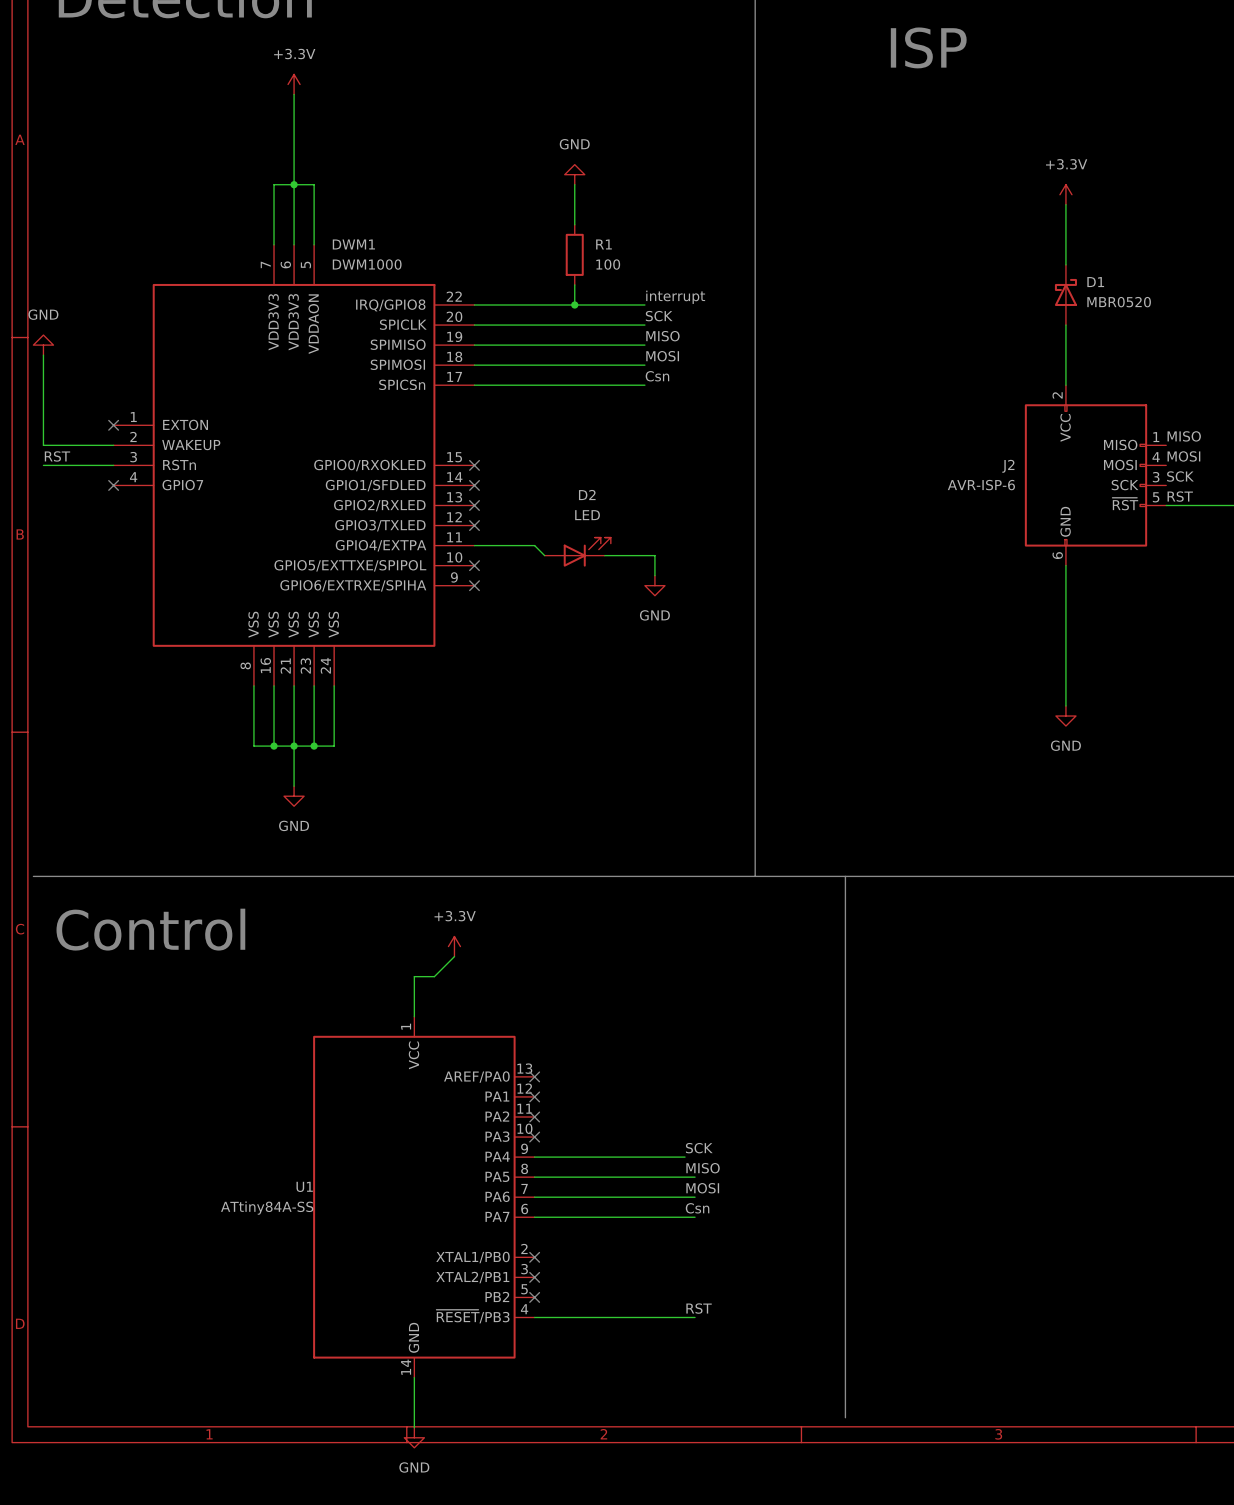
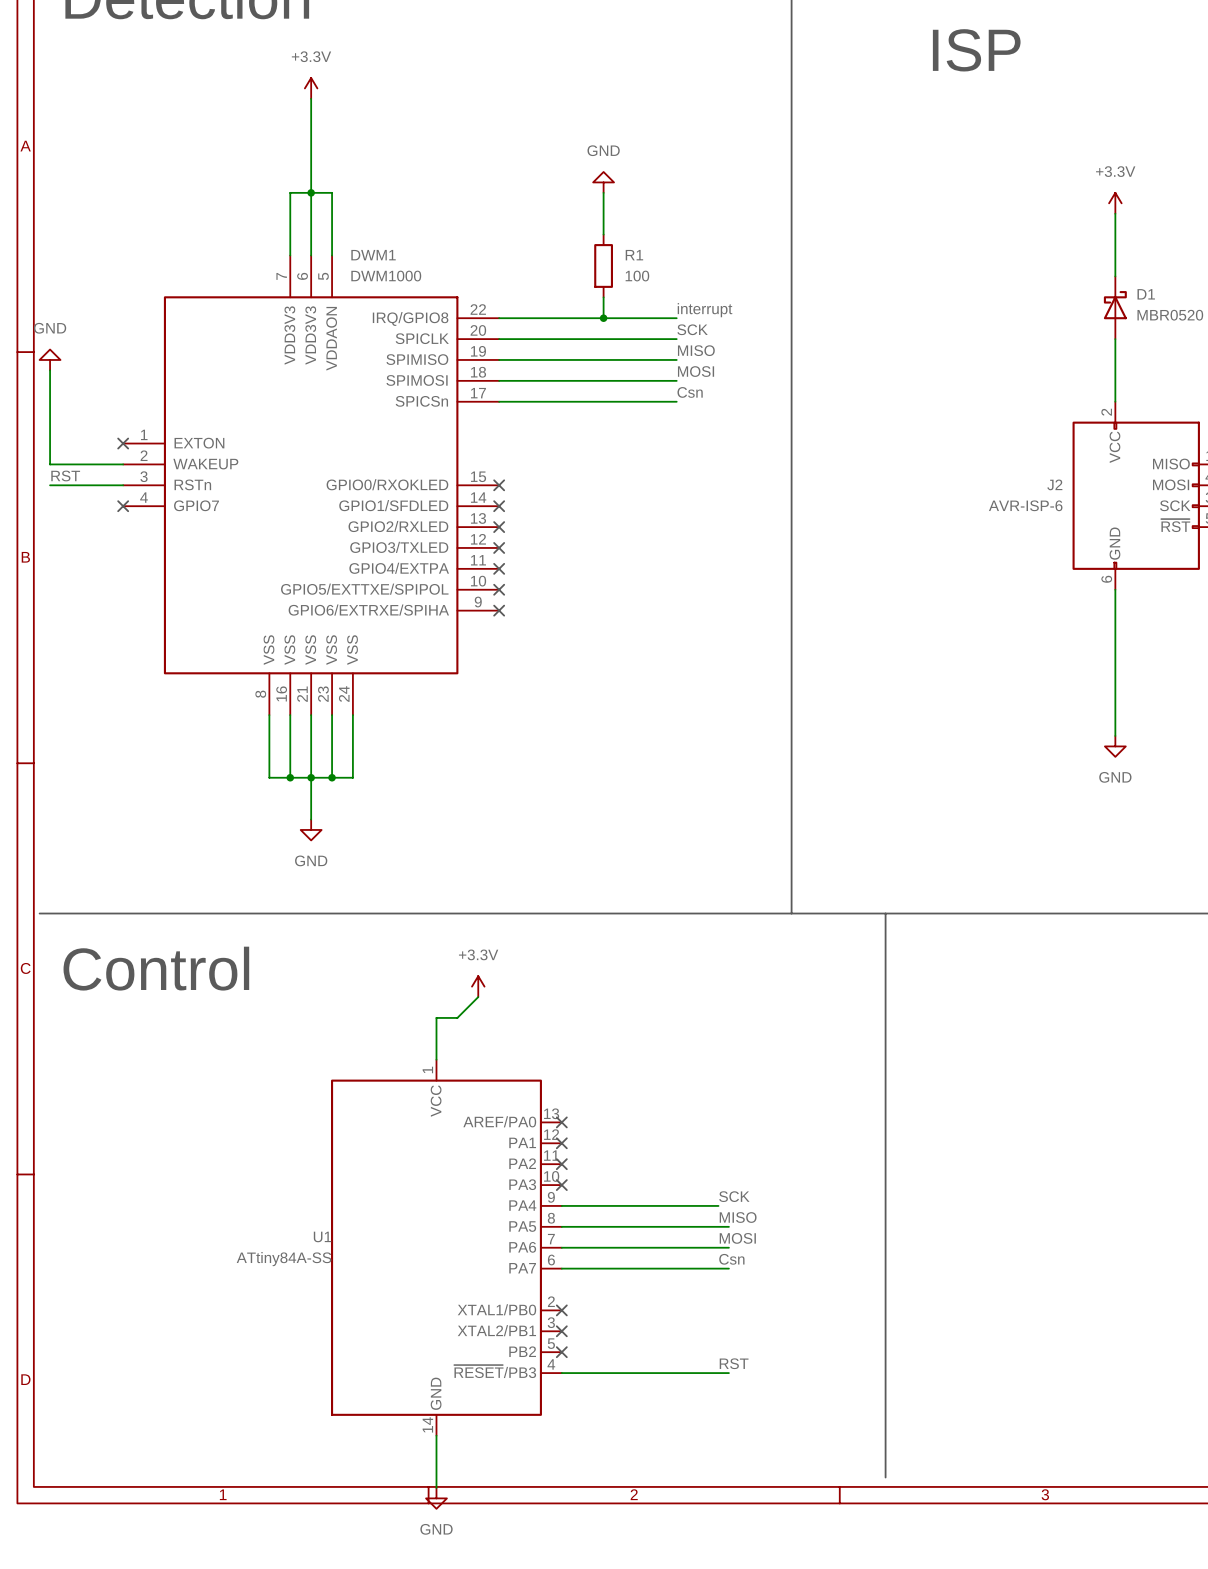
wire: (474, 545) (534, 545) (544, 555) -> none
no-connect mark: none -> (499, 568)
D2: LED (577, 552) -> none
wire: (604, 555) (654, 555) (654, 575) -> none
power symbol: GND (654, 585) -> none

